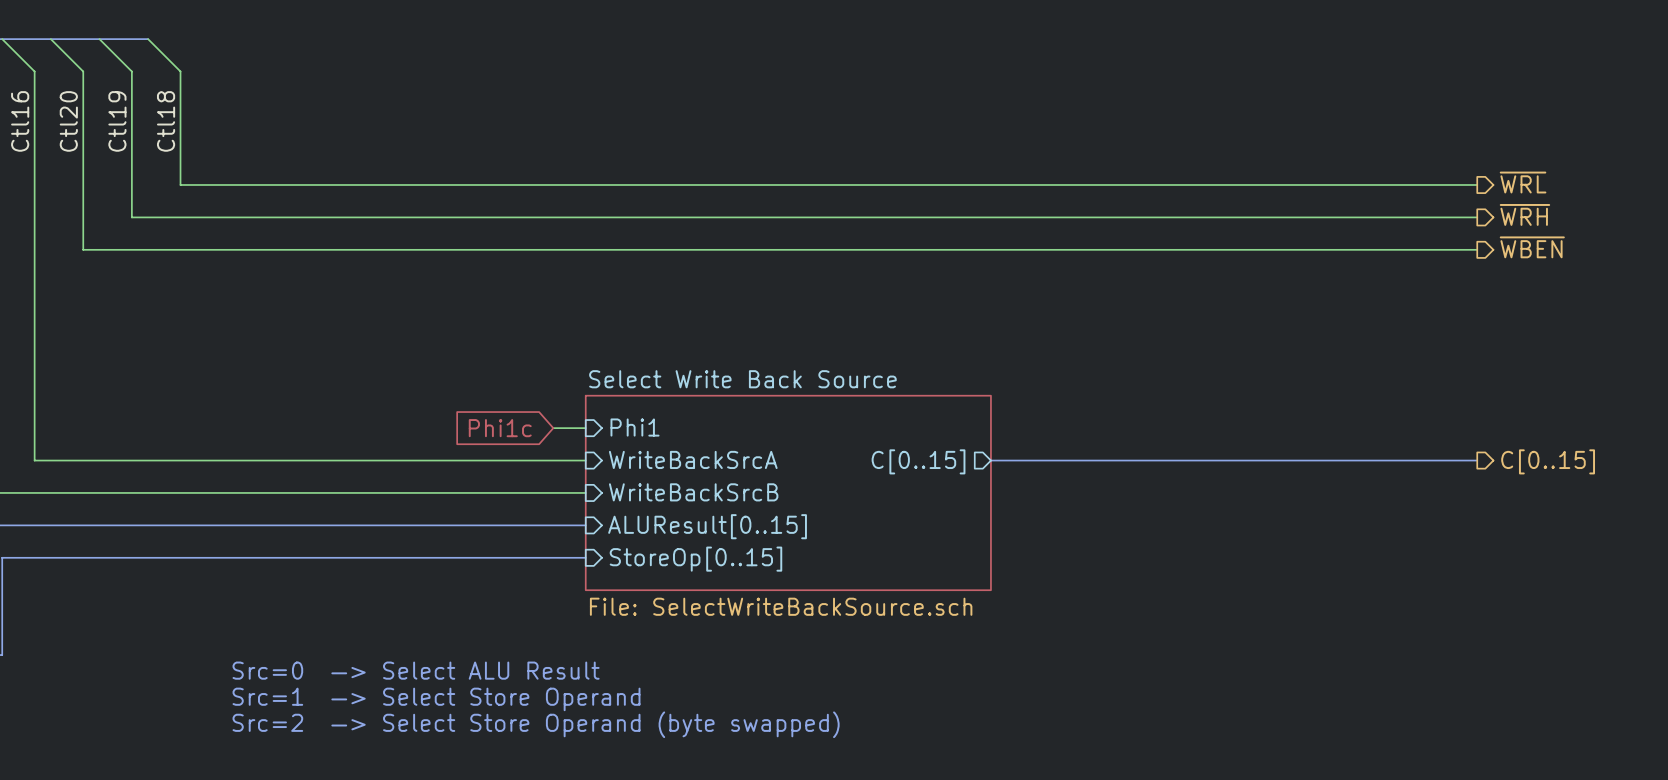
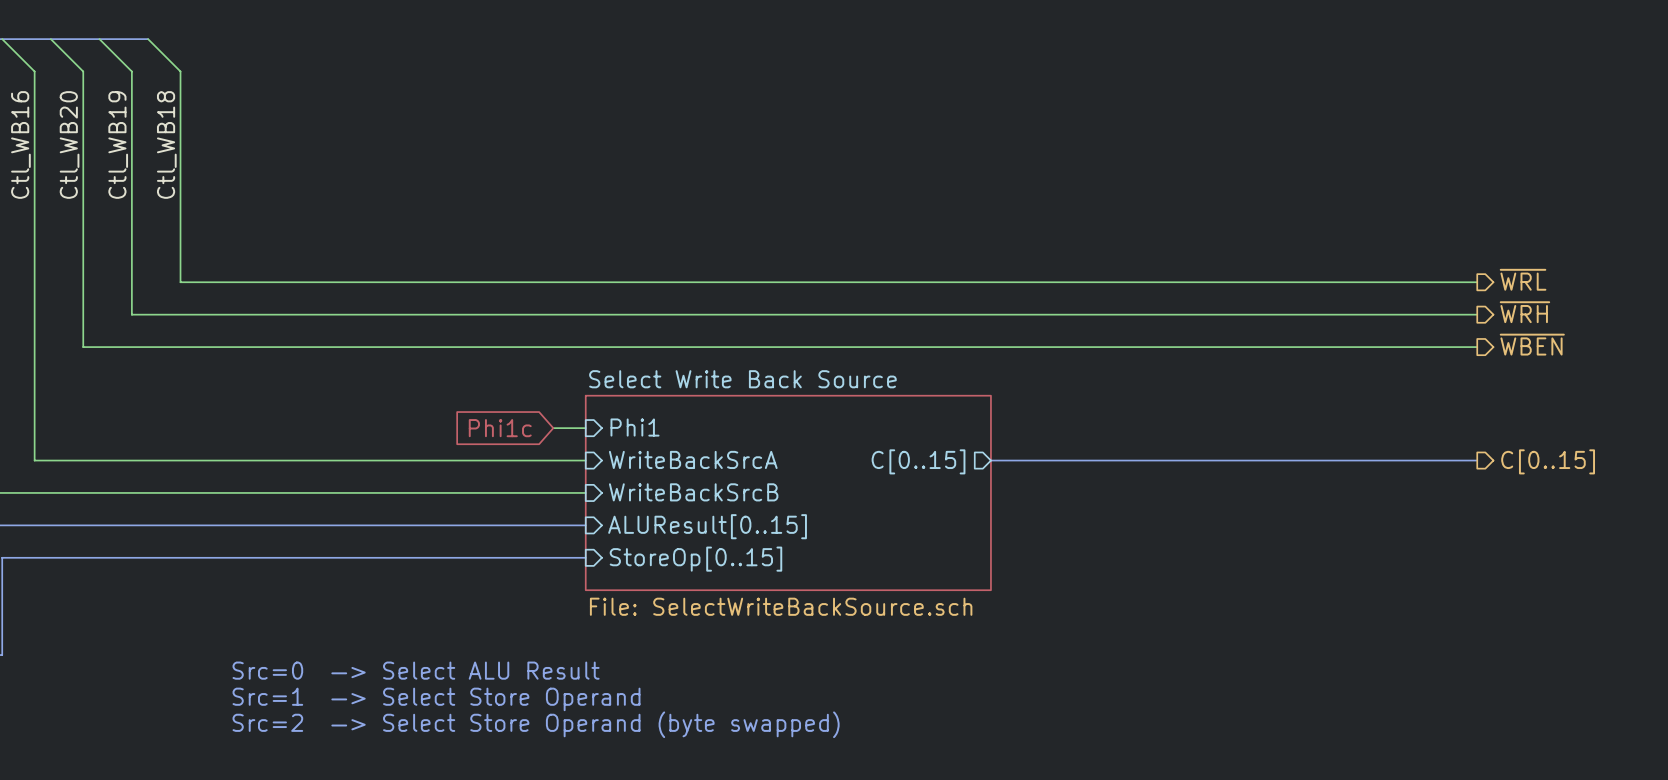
label: Ctl16 (20, 121) -> Ctl_WB16 (20, 144)
label: Ctl20 (68, 121) -> Ctl_WB20 (69, 144)
label: Ctl19 (117, 121) -> Ctl_WB19 (118, 144)
label: Ctl18 (166, 121) -> Ctl_WB18 (166, 144)
hierarchical label position: ~{WRL} (1523, 182) -> ~{WRL} (1523, 279)
wire: (180, 184) (1477, 184) -> (180, 184) (180, 282) (1477, 282)
hierarchical label position: ~{WRH} (1524, 214) -> ~{WRH} (1524, 312)
wire: (131, 217) (1477, 217) -> (131, 217) (131, 314) (1477, 314)
hierarchical label position: ~{WBEN} (1532, 247) -> ~{WBEN} (1532, 344)
wire: (83, 249) (1477, 249) -> (83, 249) (83, 347) (1477, 347)

